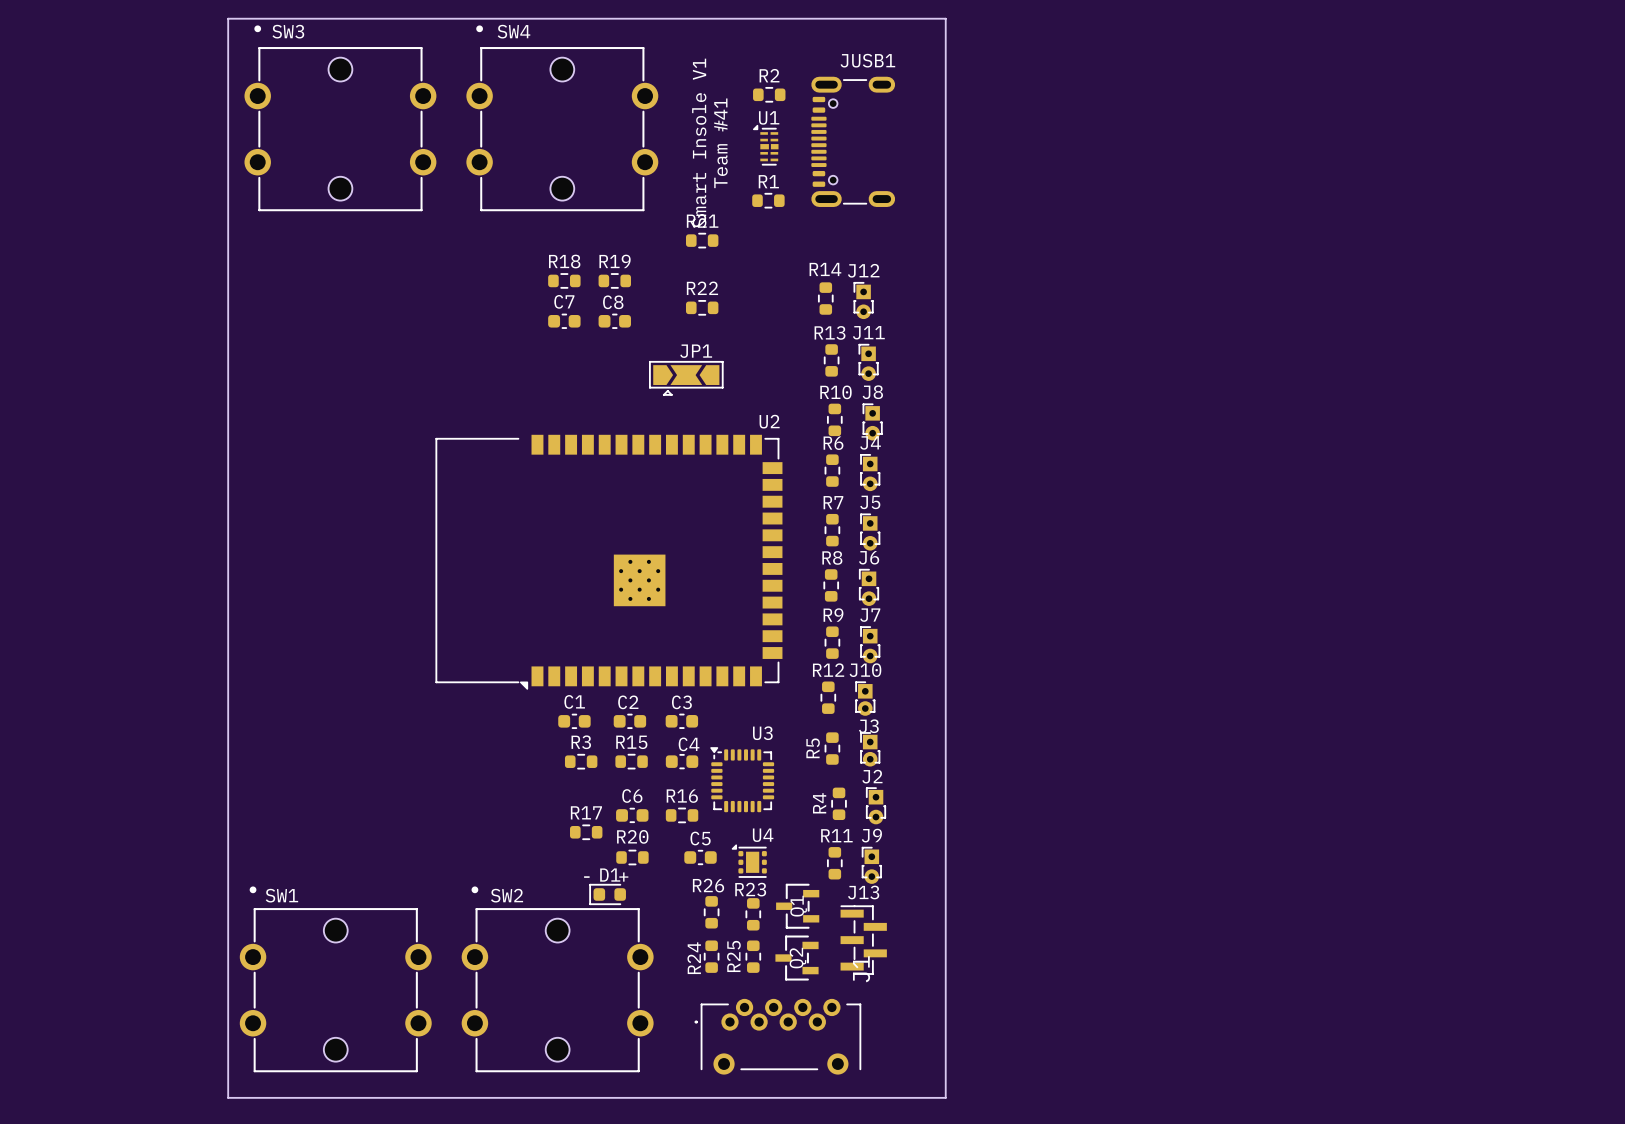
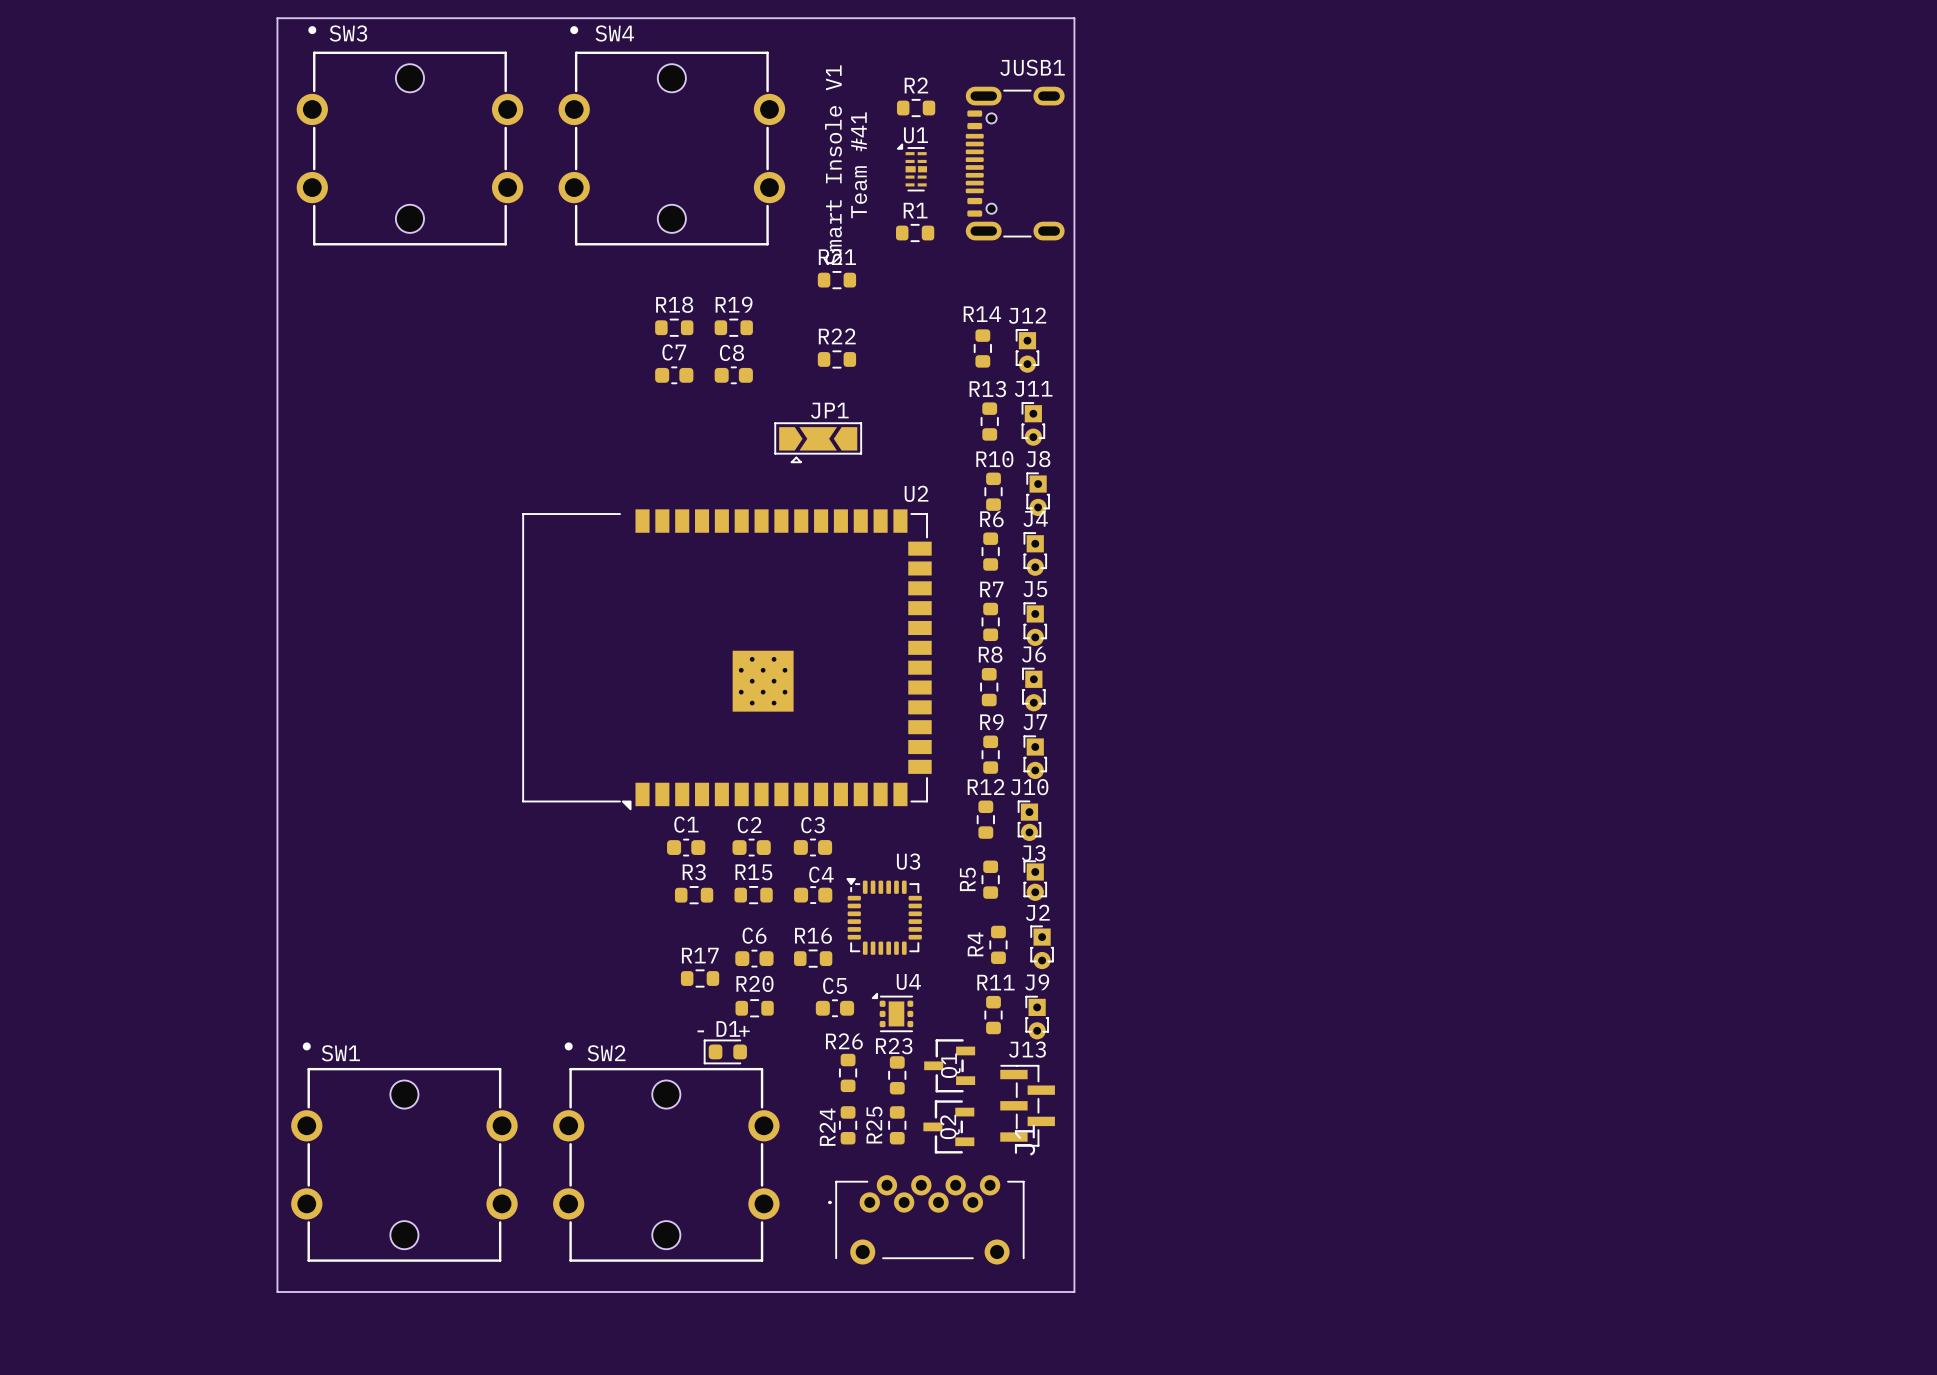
board edge: (903, 18) (945, 18) (945, 1097) (903, 1097) -> (1074, 18) (1074, 1291)

